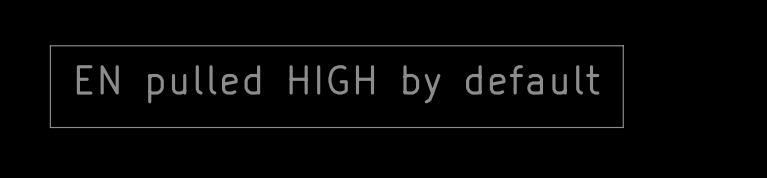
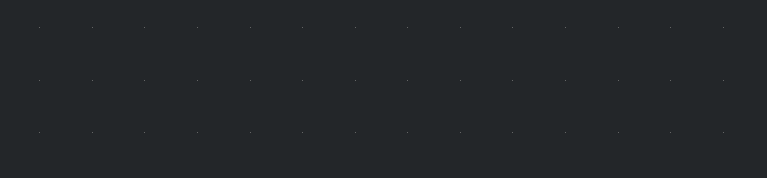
line: (50, 45) (623, 45) (623, 127) (50, 127) (50, 45) -> none
text: EN pulled HIGH by default (338, 84) -> none

